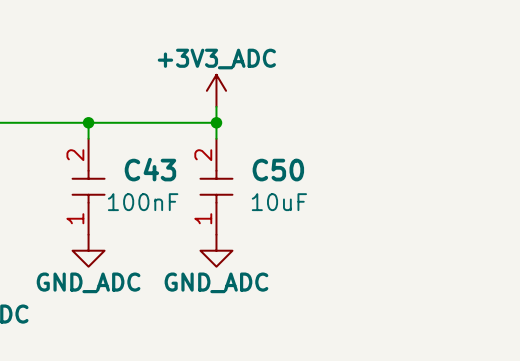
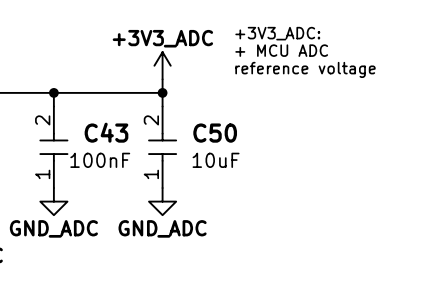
text: none -> +3V3_ADC: (277, 33)
text: none -> + MCU ADC (281, 50)
text: none -> reference voltage (305, 69)

